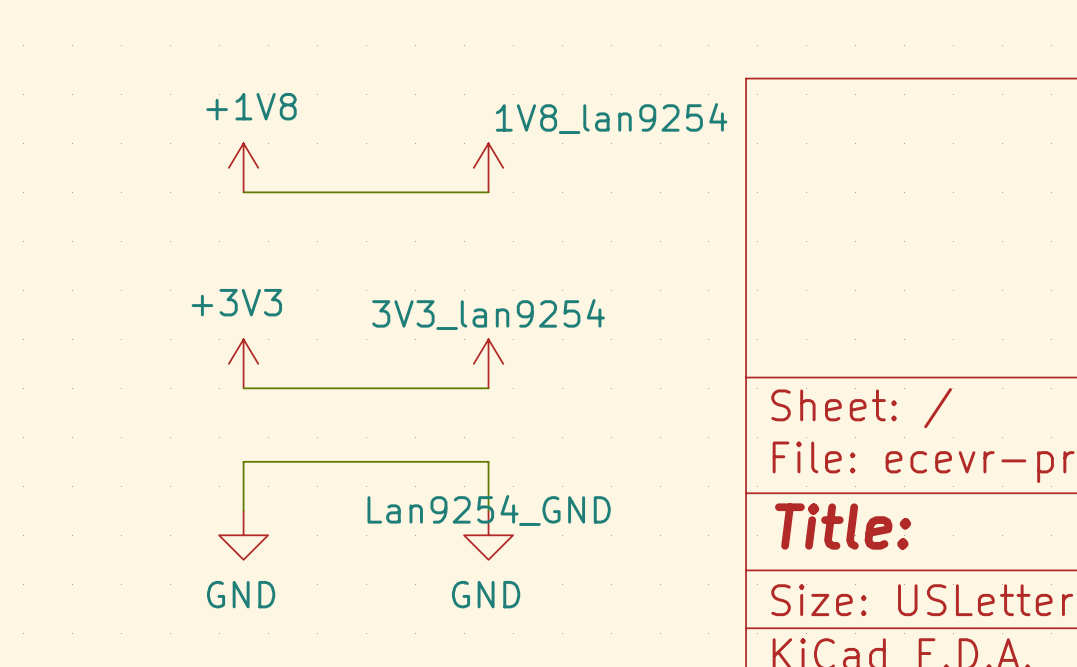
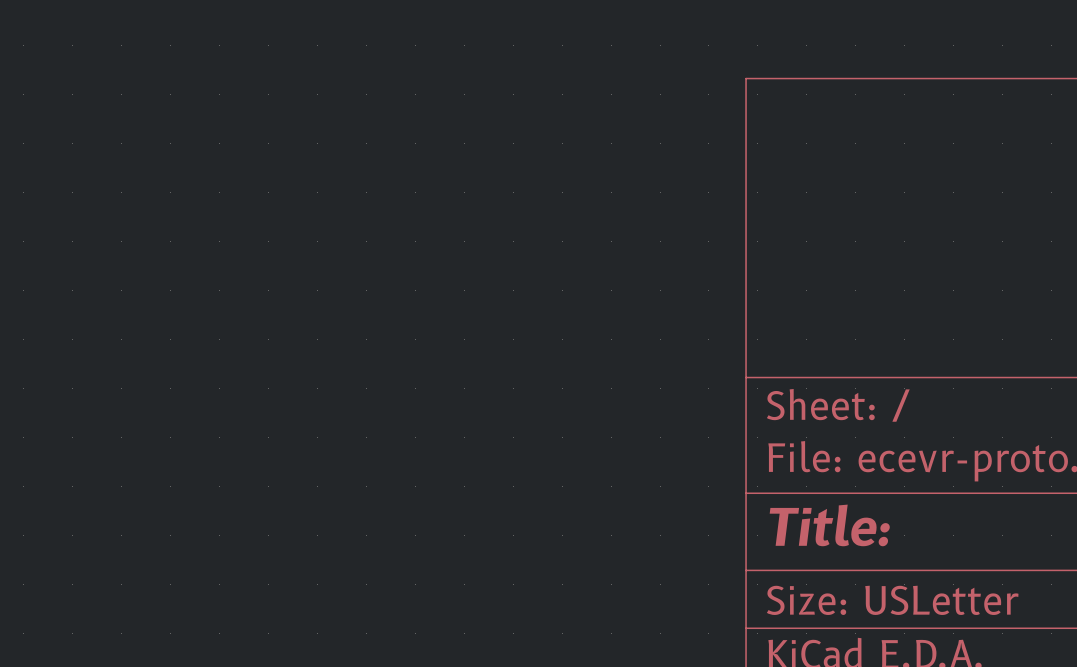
power symbol: +1V8 (243, 167) -> none
power symbol: (488, 167) -> none
wire: (243, 192) (488, 192) -> none
power symbol: +3V3 (243, 363) -> none
power symbol: (488, 363) -> none
wire: (243, 388) (488, 388) -> none
wire: (243, 510) (243, 461) (488, 461) (488, 510) -> none
power symbol: GND (243, 535) -> none
power symbol: GND (488, 535) -> none

